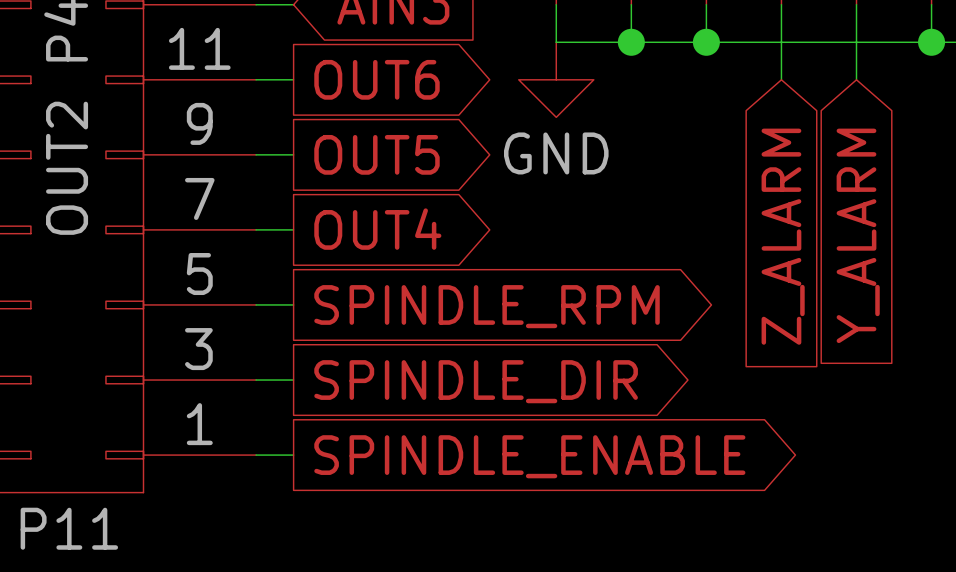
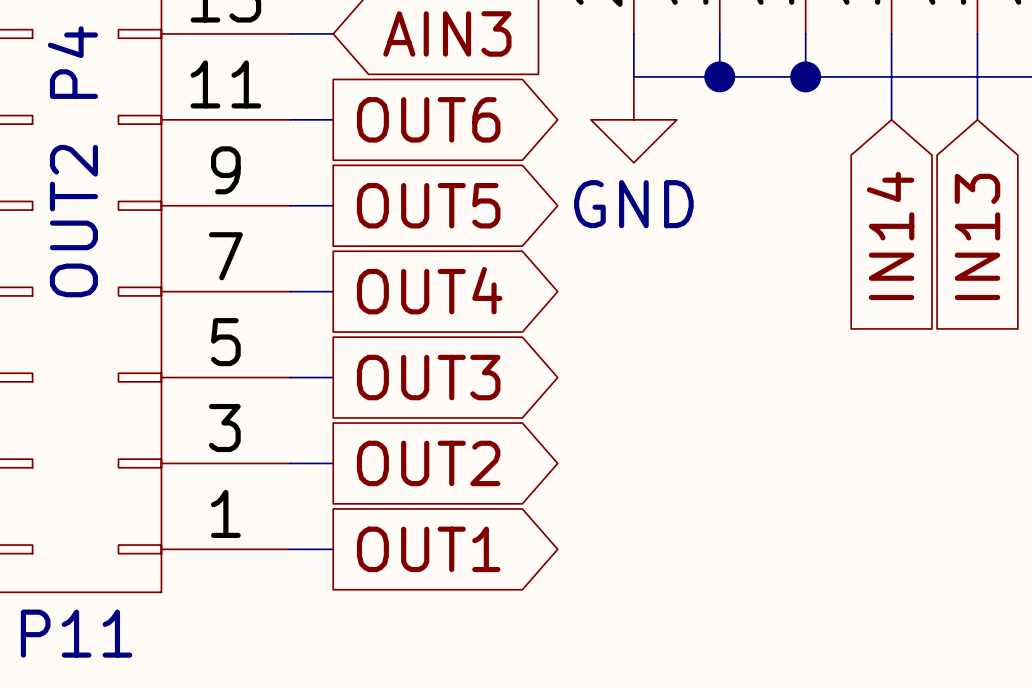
global label: Y_ALARM (858, 235) -> IN13 (977, 236)
global label: Z_ALARM (783, 236) -> IN14 (890, 235)
global label: SPINDLE_RPM (487, 306) -> OUT3 (428, 377)
global label: SPINDLE_DIR (476, 381) -> OUT2 (428, 463)
global label: SPINDLE_ENABLE (529, 456) -> OUT1 (428, 549)

